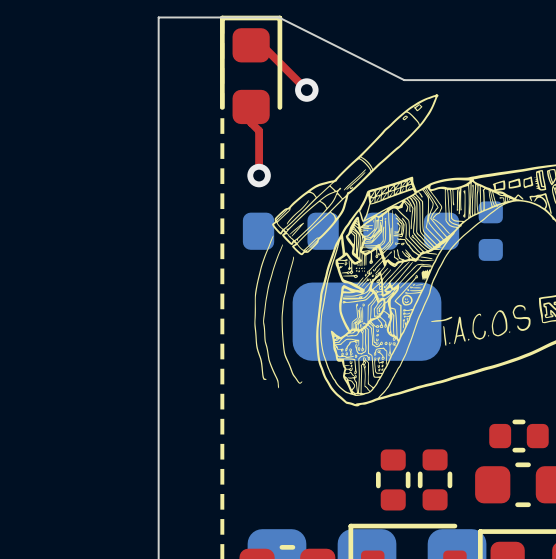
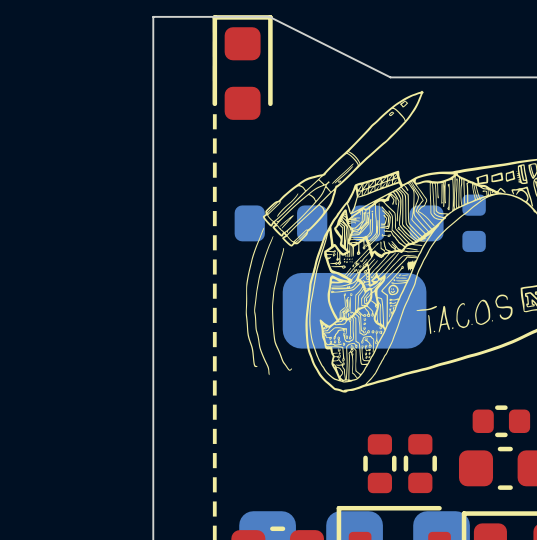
top track: (251, 45) (262, 45) (306, 90) -> none
via: (306, 90) -> none
top track: (251, 106) (251, 122) (259, 130) (259, 175) -> none
via: (259, 175) -> none

